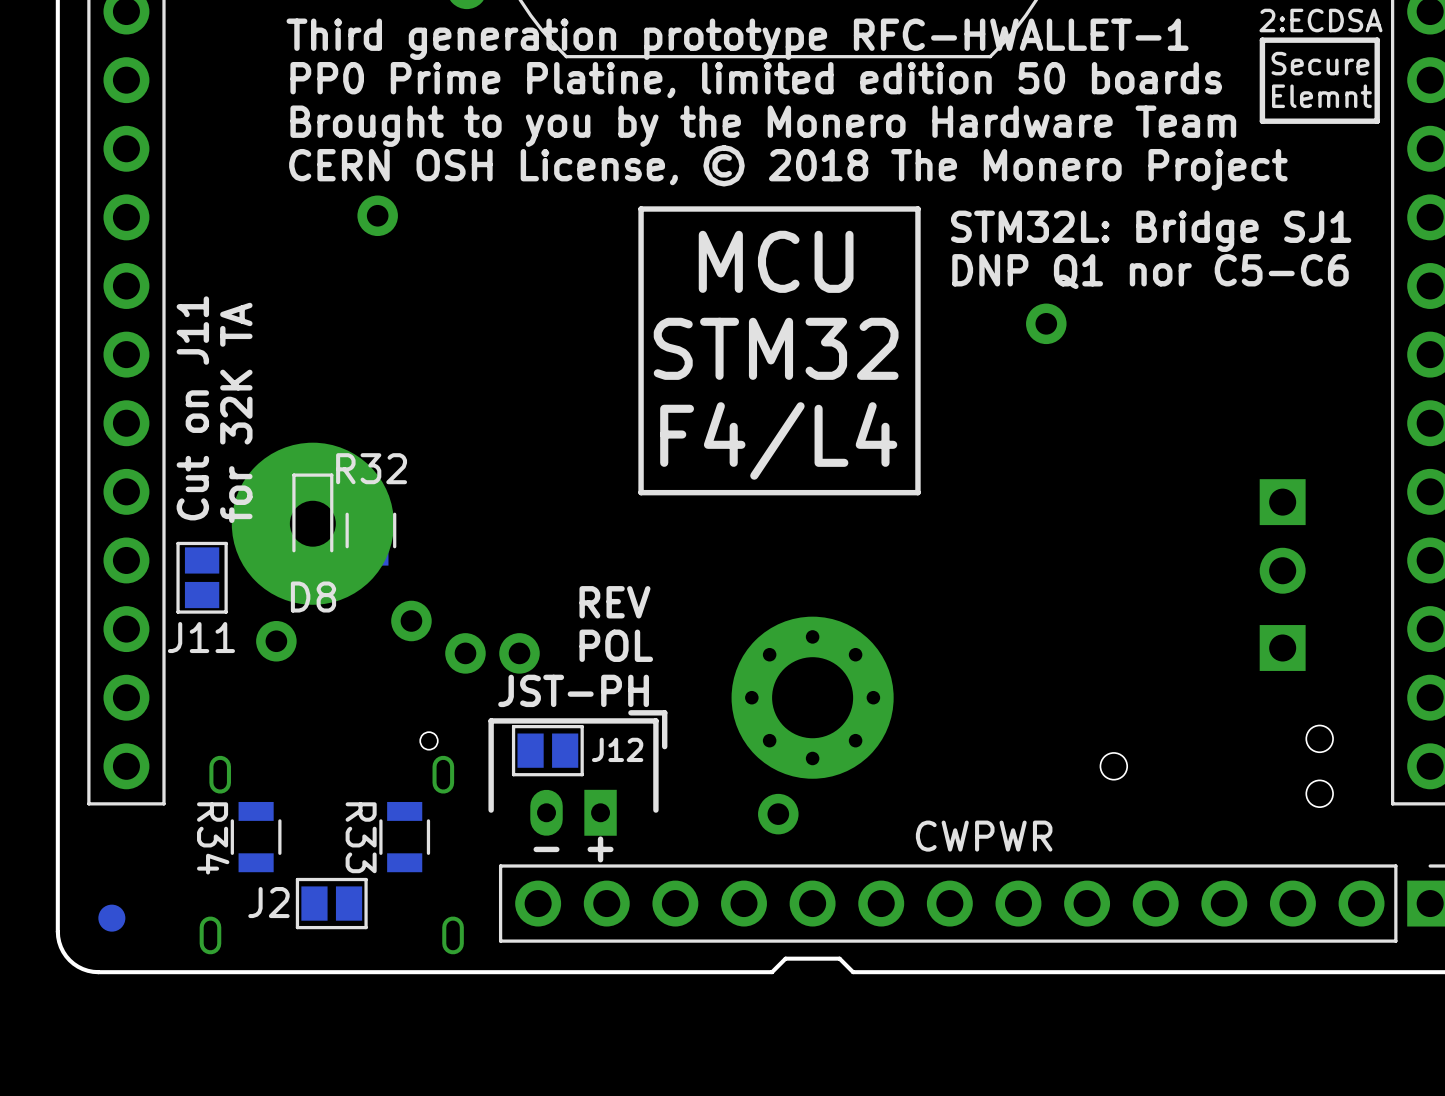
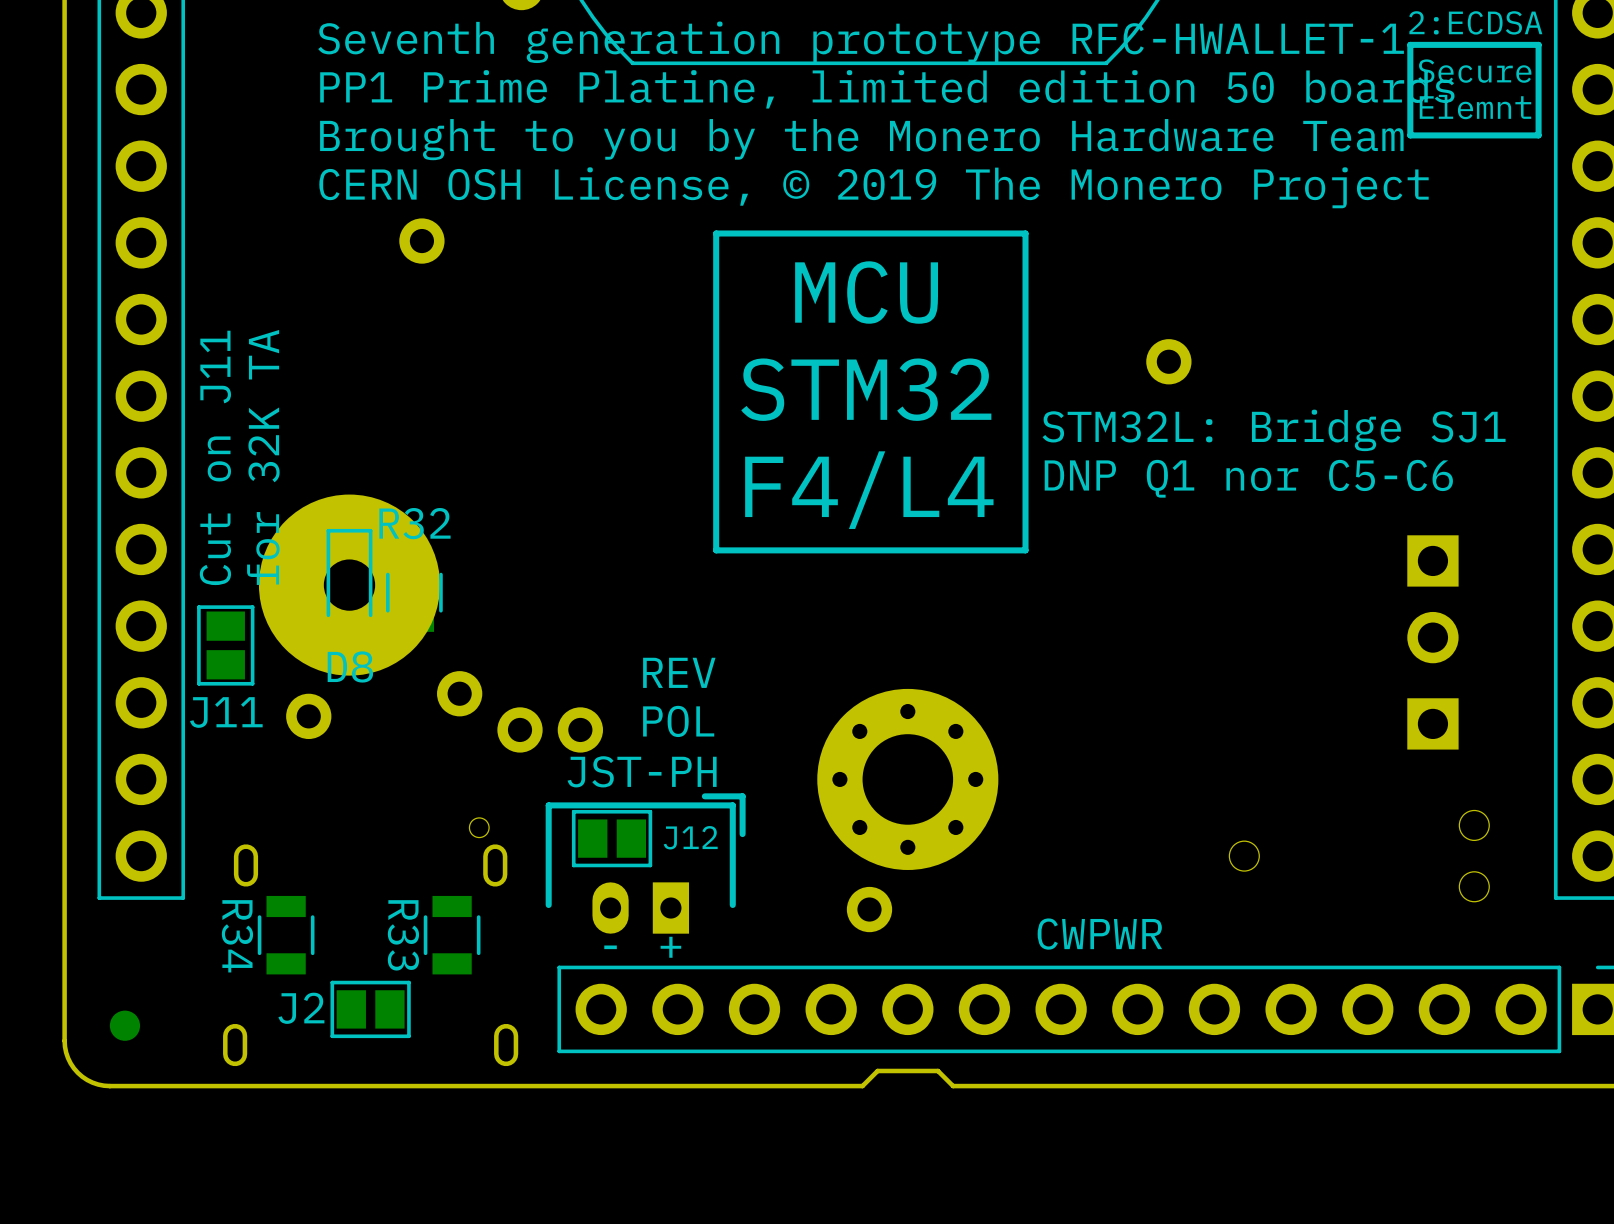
text: Third generation prototype RFC-HWALLET-1 (737, 39) -> Seventh generation prototype RFC-HWALLET-1 (861, 42)
text: PP0 Prime Platine, limited edition 50 boards (756, 80) -> PP1 Prime Platine, limited edition 50 boards (887, 89)
text: CERN OSH License, © 2018 The Monero Project (788, 167) -> CERN OSH License, © 2019 The Monero Project (874, 187)
text position: STM32L: Bridge SJ1 (1151, 231) -> STM32L: Bridge SJ1 (1274, 430)
text position: DNP Q1 nor C5-C6 (1150, 271) -> DNP Q1 nor C5-C6 (1248, 478)

